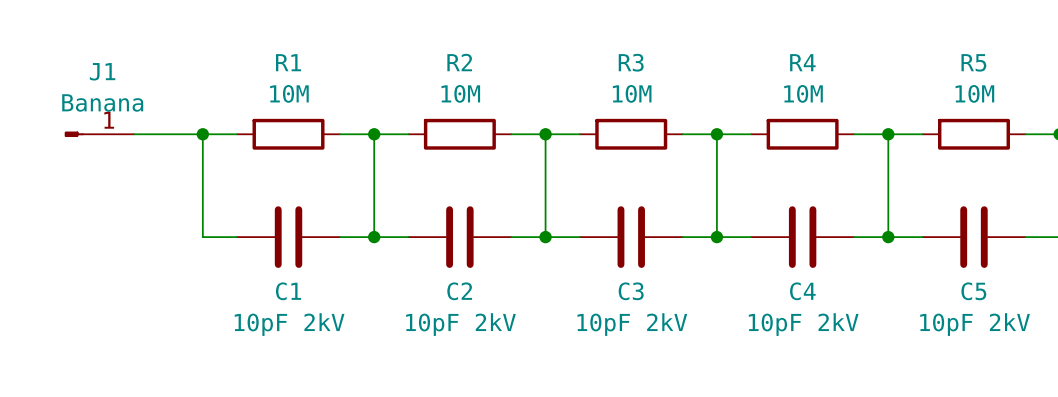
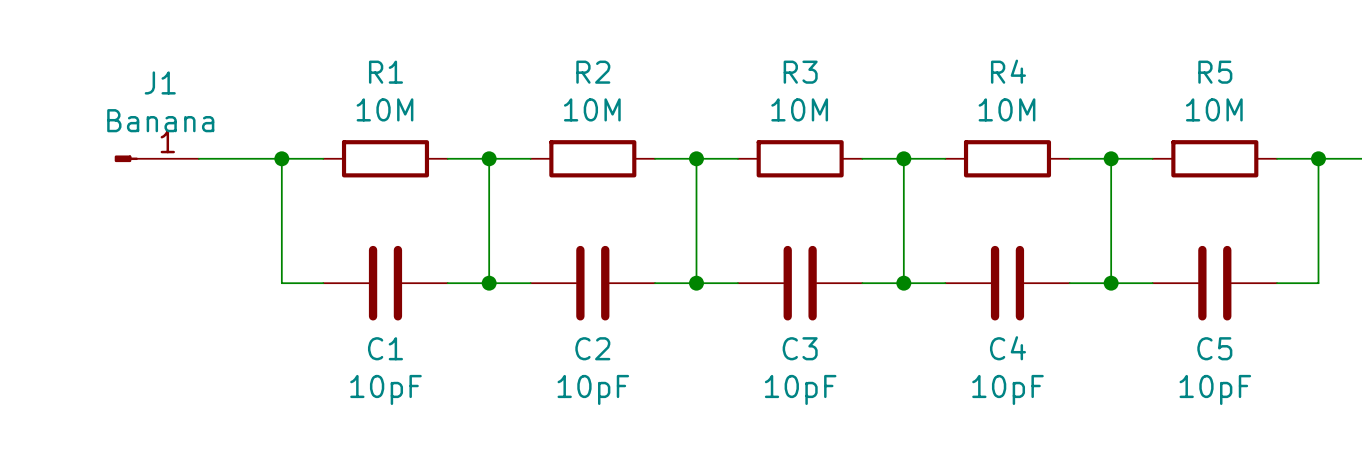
C1 value: 10pF 2kV (289, 324) -> 10pF (385, 389)
C2 value: 10pF 2kV (460, 324) -> 10pF (593, 389)
C3 value: 10pF 2kV (632, 324) -> 10pF (800, 389)
C4 value: 10pF 2kV (803, 324) -> 10pF (1007, 389)
C5 value: 10pF 2kV (975, 324) -> 10pF (1215, 389)

